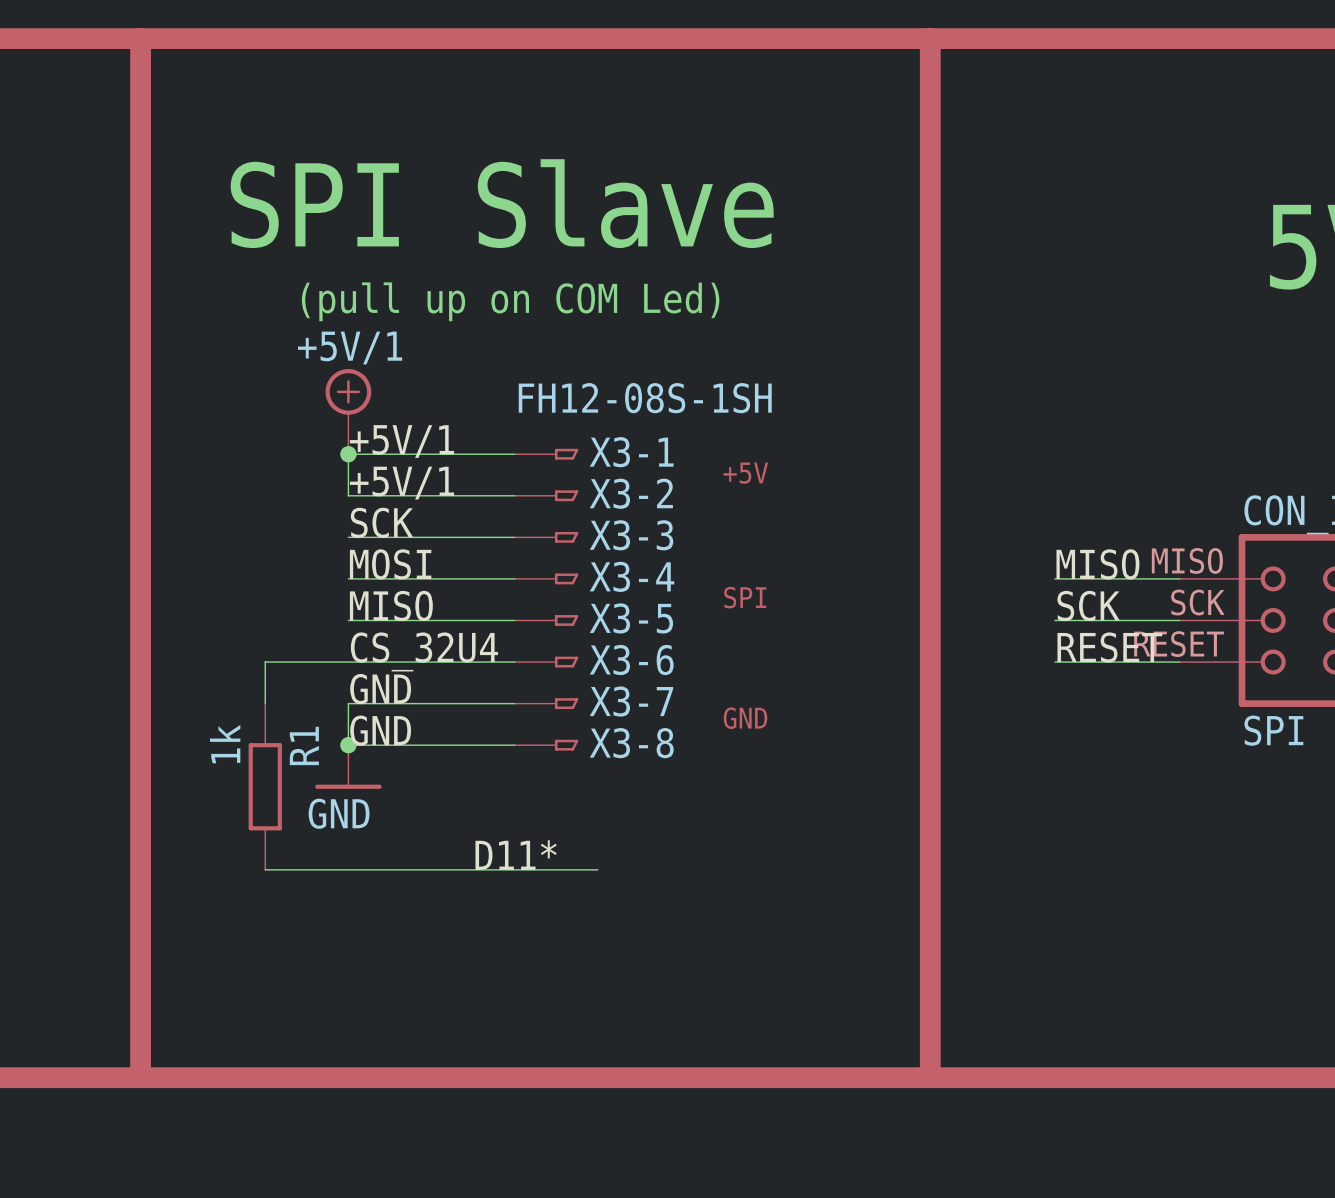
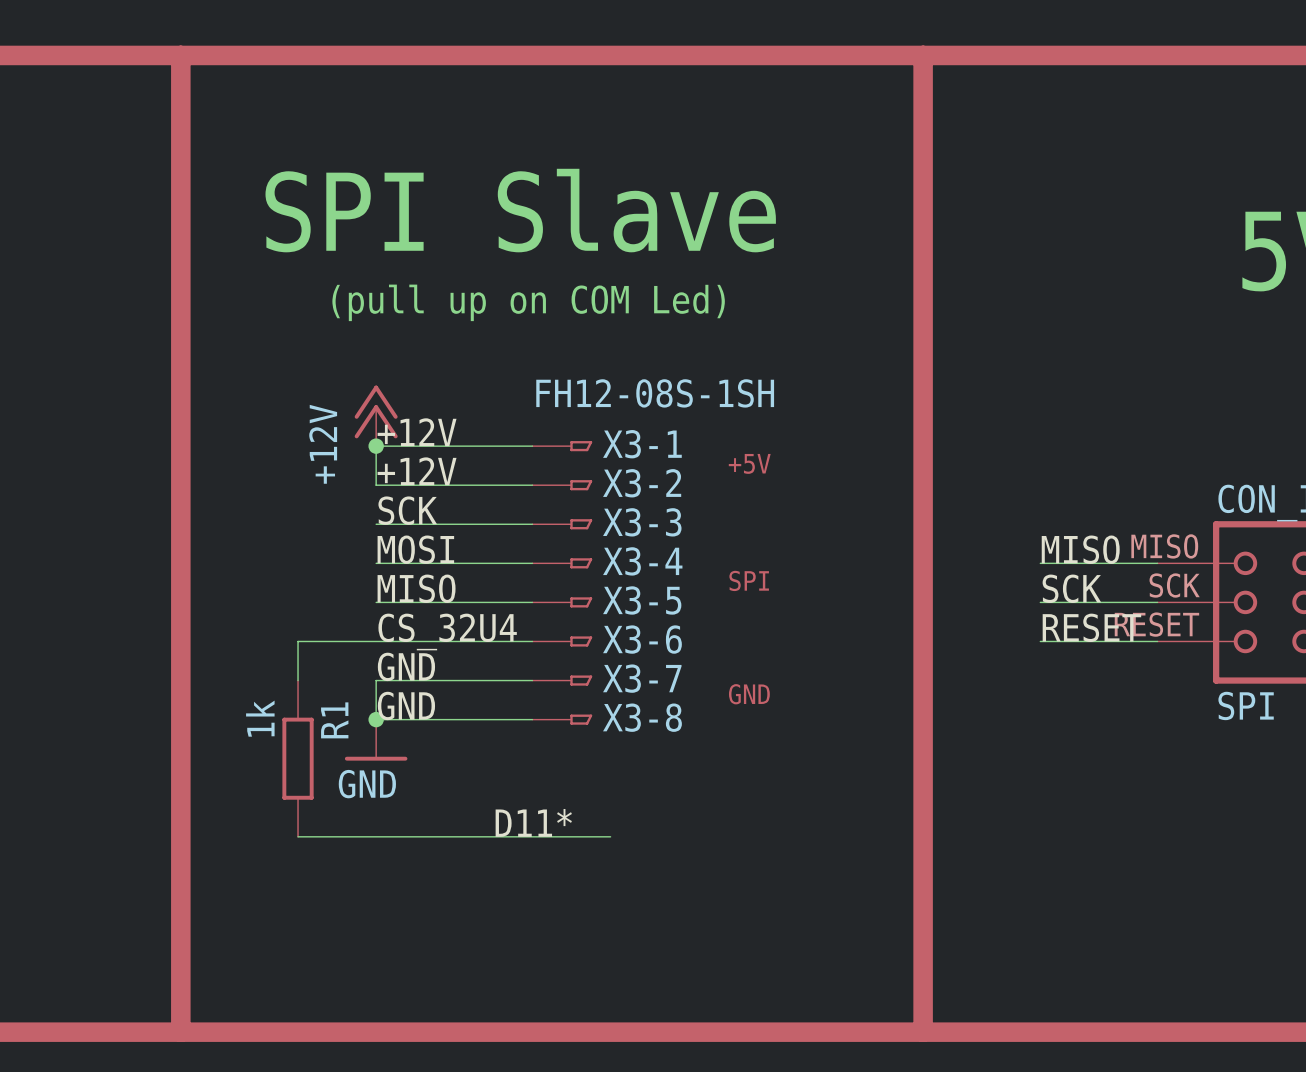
power symbol: +5V/1 (348, 411) -> +12V (376, 415)
label: +5V/1 (402, 441) -> +12V (417, 432)
label: +5V/1 (402, 483) -> +12V (417, 471)

